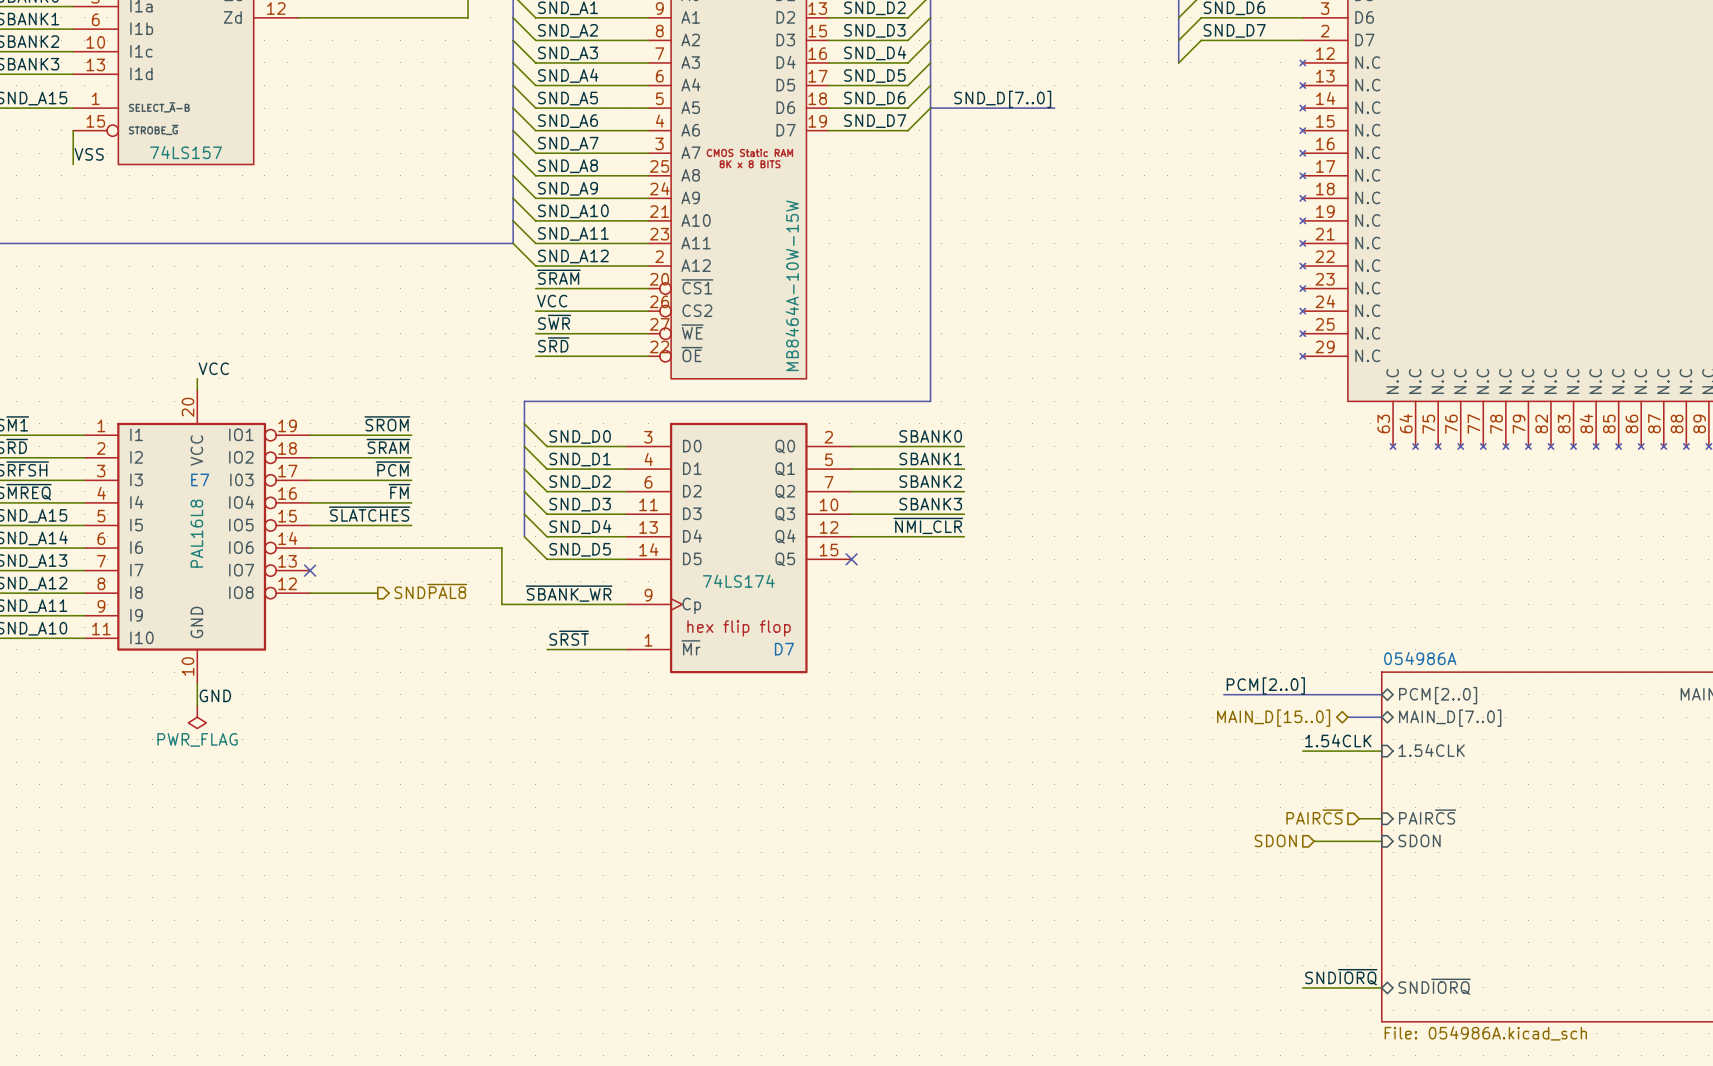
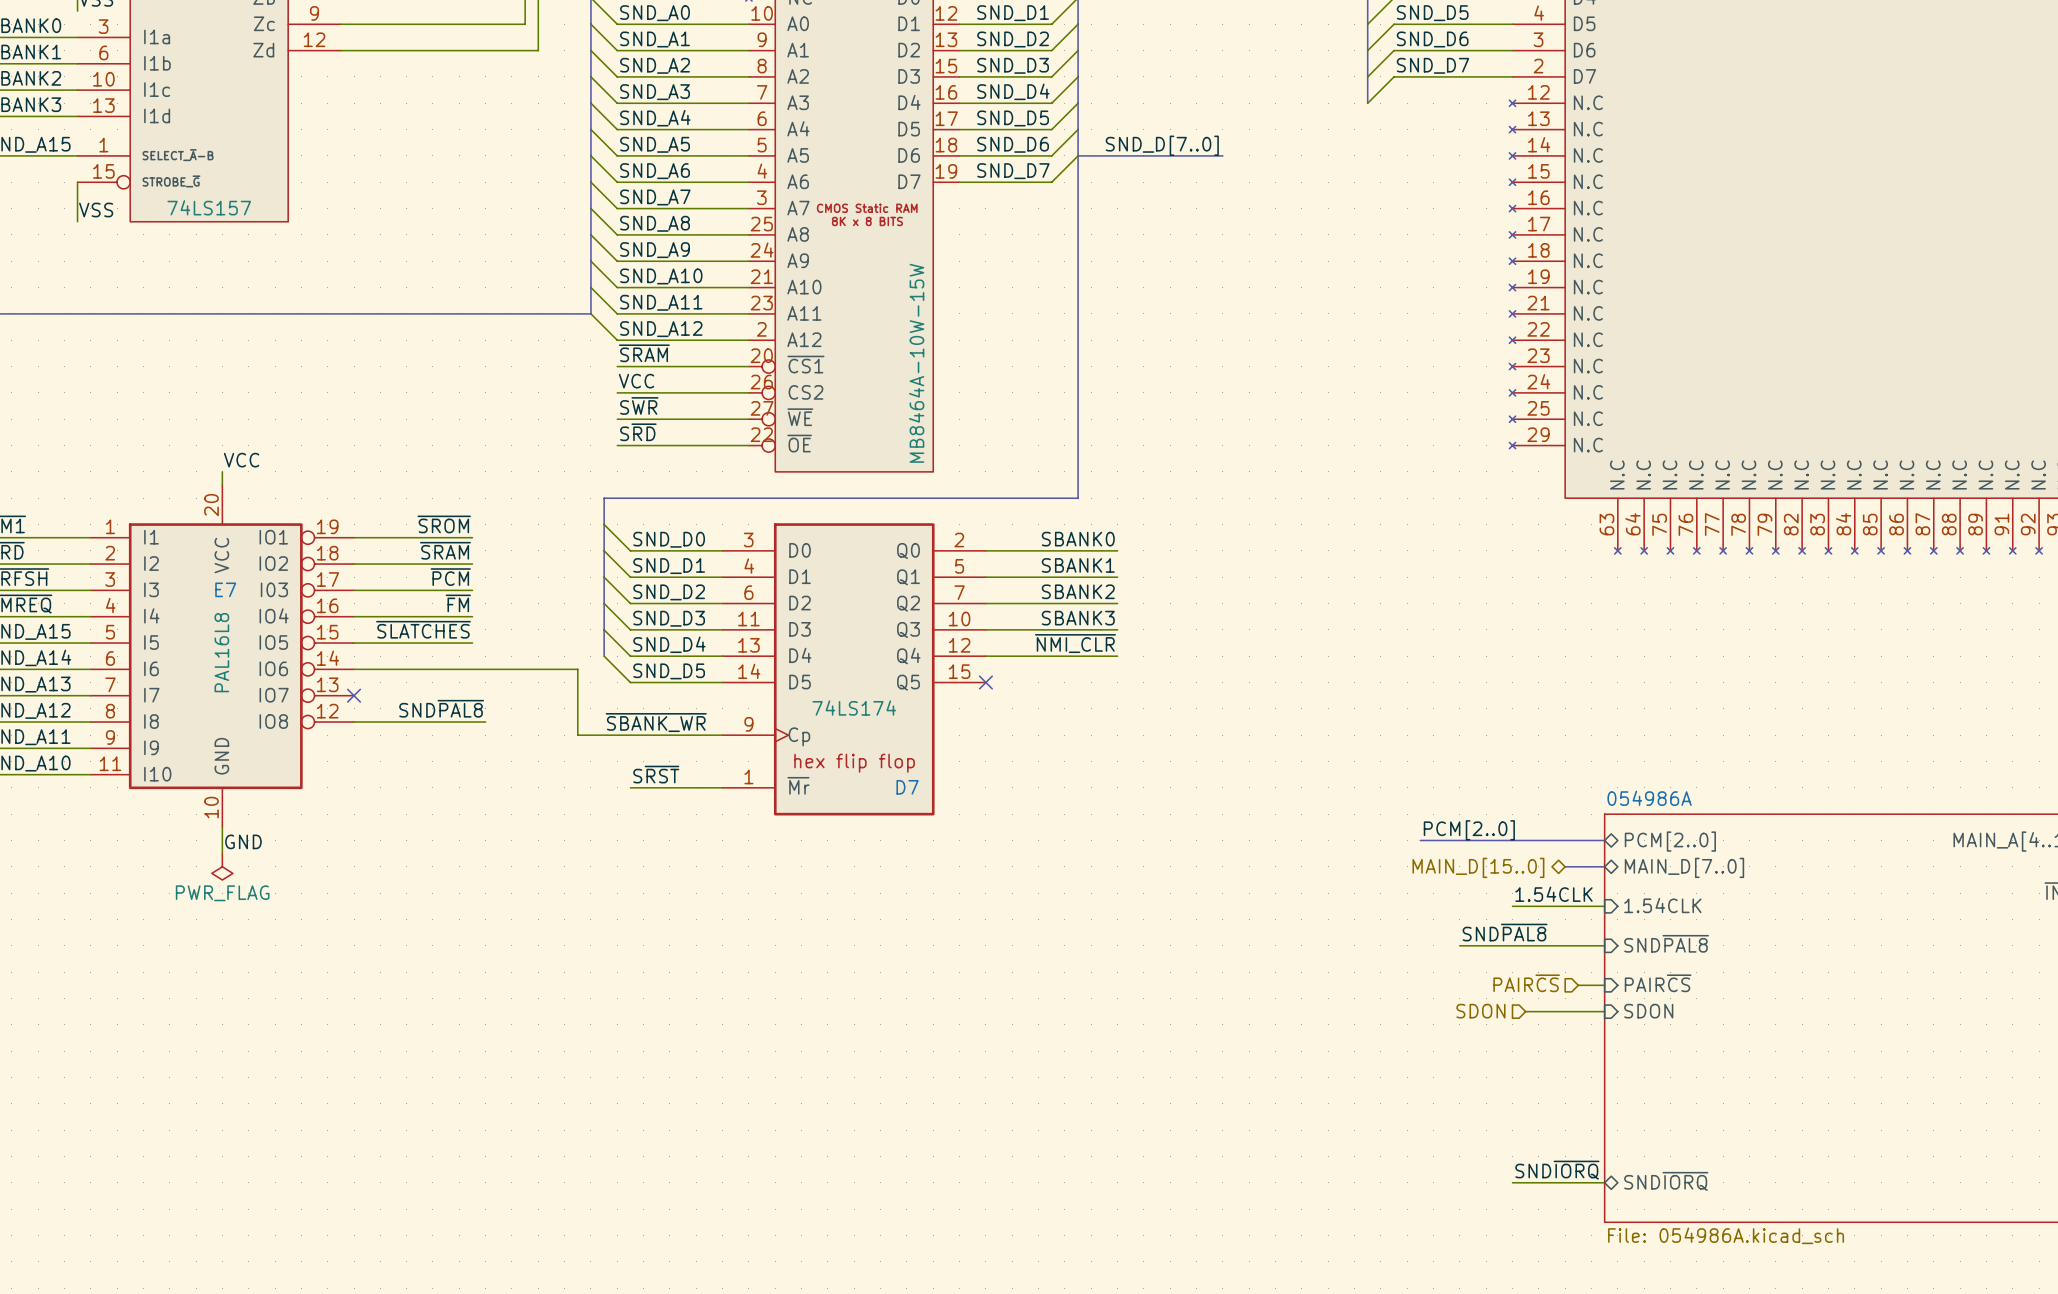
label: none -> SND~{PAL8} (441, 708)
hierarchical label: SND~{PAL8} (430, 591) -> none
wire: none -> (432, 722) (485, 722)
label: none -> SND~{PAL8} (1505, 932)
sheet pin: none -> SND~{PAL8} (1666, 943)
wire: none -> (1459, 945) (1604, 945)

